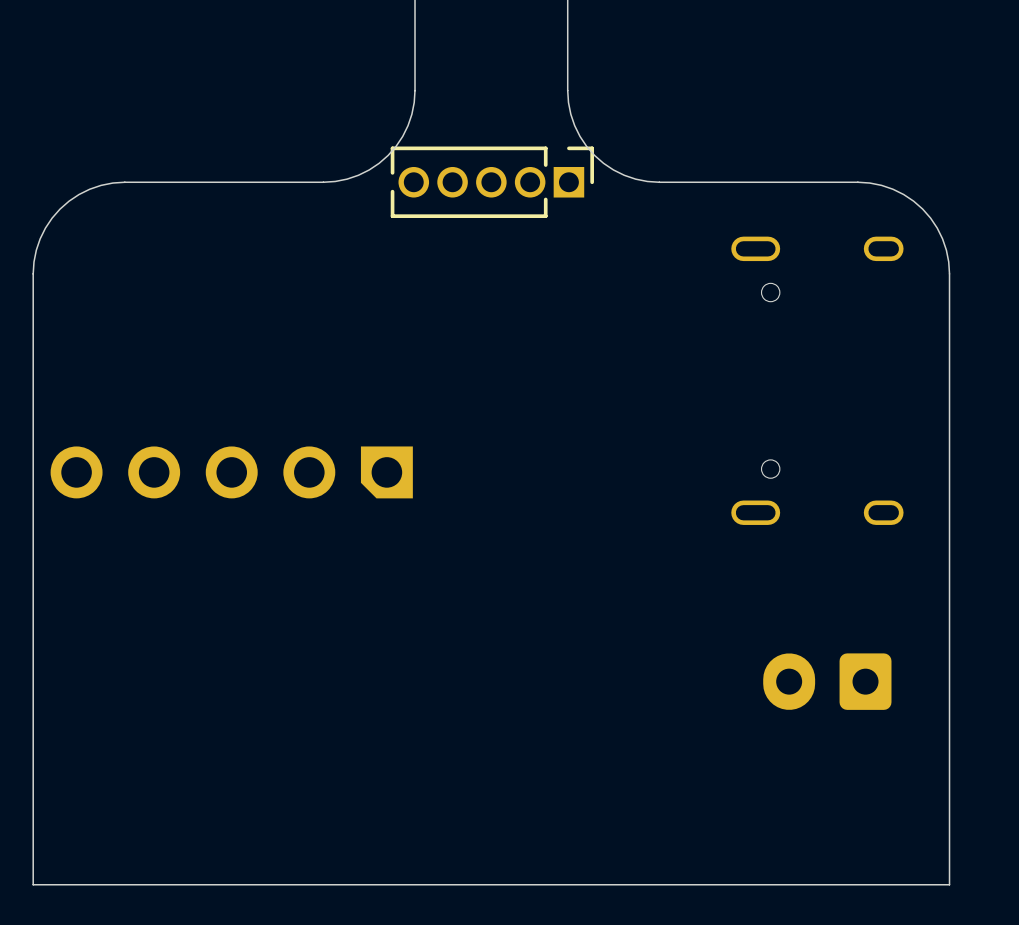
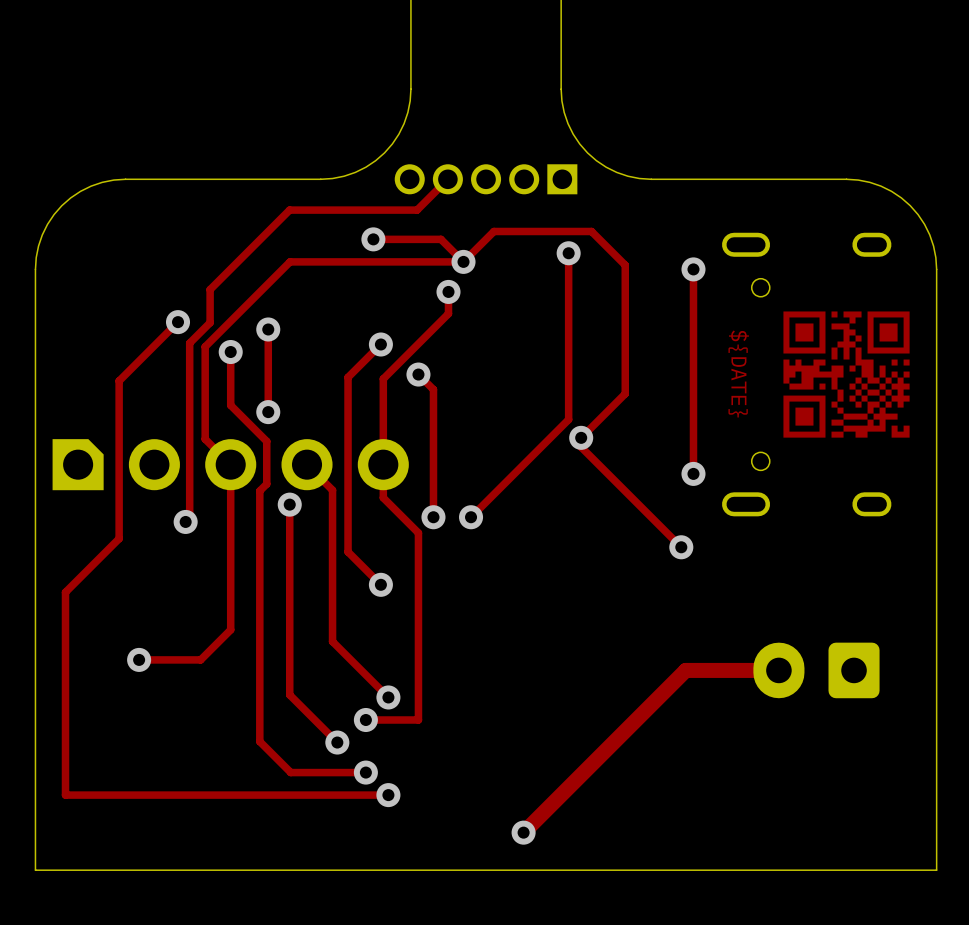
part footprint: [390, 146, 594, 218] -> [394, 164, 578, 195]
track: none -> (447, 179) (417, 210) (289, 210) (210, 289) (210, 322) (189, 343) (189, 517) (185, 521)
track: none -> (373, 239) (440, 239) (463, 261)
via: none -> (373, 239)
track: none -> (568, 253) (568, 419) (471, 517)
via: none -> (568, 253)
track: none -> (463, 261) (493, 231) (591, 231) (625, 265) (625, 393) (581, 437) (581, 447) (681, 547)
track: none -> (463, 261) (290, 261) (205, 346) (205, 439) (230, 464) (230, 629) (200, 659) (139, 659)
via: none -> (463, 261)
track: none -> (693, 269) (693, 473)
via: none -> (693, 269)
track: none -> (448, 291) (448, 313) (383, 378) (383, 497) (418, 532) (418, 720) (365, 720)
via: none -> (448, 291)
track: none -> (178, 322) (119, 380) (119, 538) (65, 592) (65, 795) (388, 795)
via: none -> (178, 322)
track: none -> (268, 329) (268, 412)
via: none -> (268, 329)
track: none -> (380, 344) (348, 377) (348, 551) (380, 584)
via: none -> (380, 344)
track: none -> (230, 352) (230, 405) (266, 441) (266, 484) (259, 490) (259, 741) (290, 772) (365, 772)
via: none -> (230, 352)
track: none -> (418, 374) (433, 389) (433, 517)
via: none -> (418, 374)
part: none -> (846, 374)
via: none -> (268, 412)
via: none -> (581, 437)
part rotation: 0° (231, 472) -> 180° (230, 464)
track: none -> (307, 464) (332, 490) (332, 641) (388, 697)
via: none -> (693, 473)
track: none -> (289, 504) (289, 694) (337, 742)
via: none -> (289, 504)
via: none -> (433, 517)
via: none -> (471, 517)
via: none -> (185, 521)
via: none -> (681, 547)
via: none -> (380, 584)
via: none -> (139, 659)
track: none -> (778, 670) (685, 670) (523, 832)
via: none -> (388, 697)
via: none -> (365, 720)
via: none -> (337, 742)
via: none -> (365, 772)
via: none -> (388, 795)
via: none -> (523, 832)

